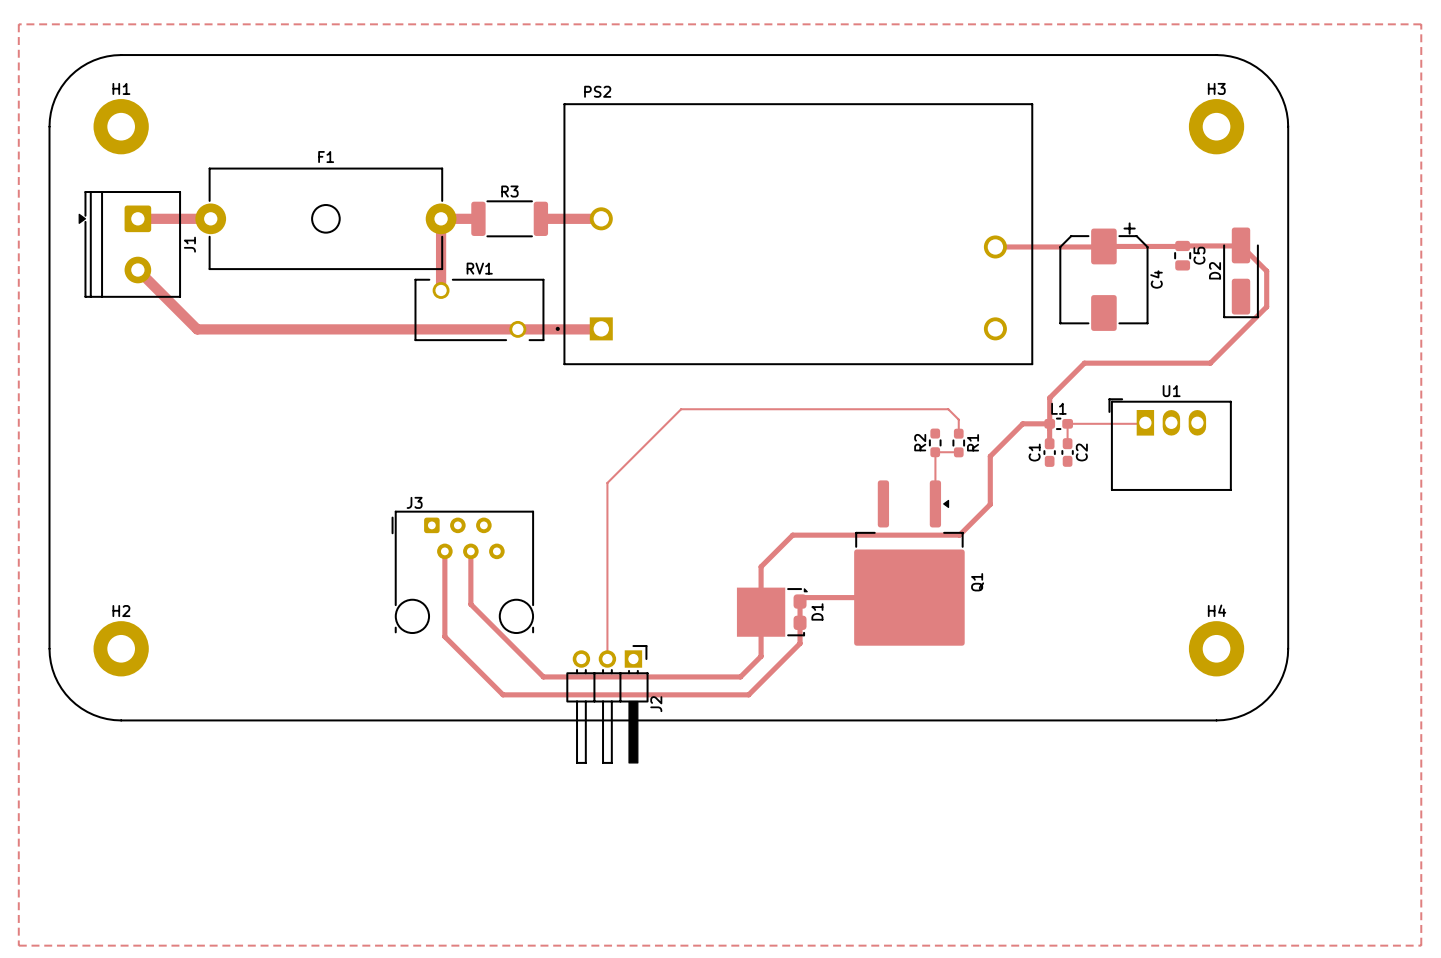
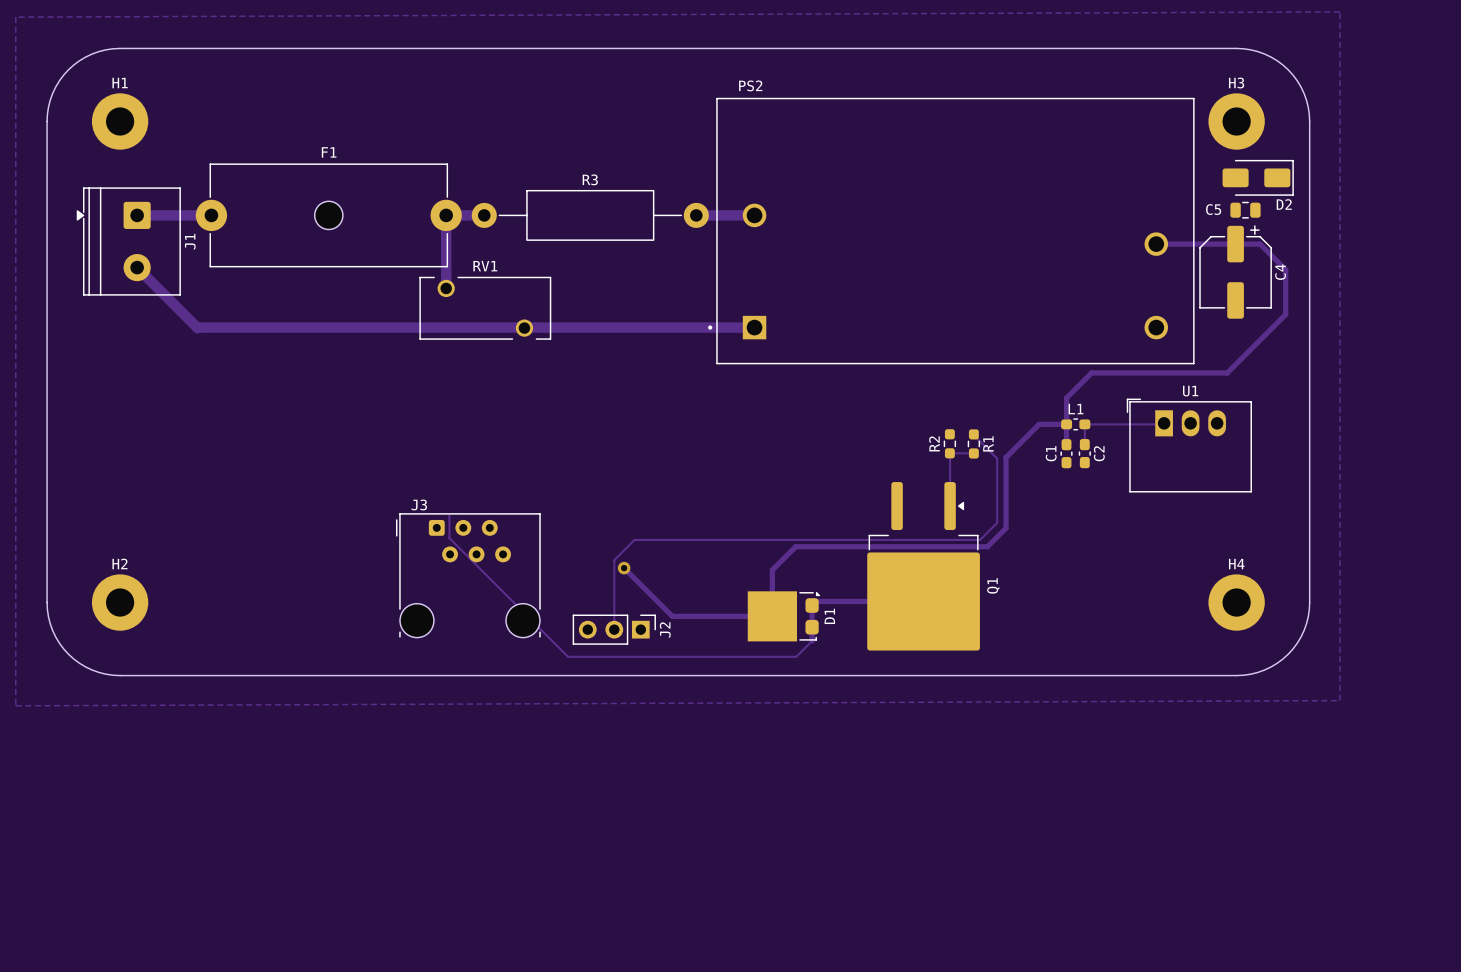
zone outline: (18, 24) (1421, 24) (1421, 945) (18, 945) (18, 699) -> (15, 17) (1339, 11) (1339, 700) (15, 705)
R3 footprint: [471, 200, 549, 237] -> [471, 190, 709, 241]
track: (540, 218) (601, 218) -> none
track: none -> (696, 215) (754, 215)
C4 footprint: [1059, 222, 1149, 331] -> [1199, 225, 1272, 319]
D2 footprint: [1223, 227, 1259, 318] -> [1222, 160, 1294, 196]
PS2 position: (794, 234) -> (951, 231)
track: (995, 246) (1241, 245) (1266, 271) (1266, 306) (1210, 363) (1084, 363) (1074, 373) -> (1156, 244) (1260, 244) (1285, 269) (1285, 314) (1227, 372) (1091, 372)
C5 rotation: 0° (1182, 255) -> 90° clockwise (1245, 210)
C5 position: (1182, 255) -> (1245, 210)
C5 name position: C5 (1199, 255) -> C5 (1213, 209)
D2 name position: D2 (1215, 270) -> D2 (1284, 204)
track: (600, 328) (197, 329) -> (754, 327) (197, 328)
track: (958, 433) (958, 419) (948, 409) (681, 409) (607, 482) (607, 659) -> none
track: none -> (973, 435) (997, 458) (997, 522) (980, 539) (634, 539) (614, 560) (614, 629)
track: (990, 504) (959, 535) (792, 535) (784, 543) -> (1006, 506) (1006, 528) (987, 546) (795, 546)
track: (444, 551) (444, 636) (503, 694) (748, 694) (800, 643) (800, 636) -> (449, 515) (449, 538) (568, 656) (796, 656) (812, 640)
track: (470, 551) (470, 604) (543, 676) (740, 676) (761, 656) (761, 612) -> (624, 568) (672, 616) (772, 616)
via: none -> (624, 568)
board edge: (49, 598) (49, 655) (57, 682) (65, 694) (81, 708) (100, 717) (121, 720) (1223, 720) (1237, 717) (1256, 708) (1271, 694) (1279, 682) (1287, 655) (1288, 598) -> (47, 602) (52, 630) (68, 654) (92, 670) (120, 675) (1243, 675) (1264, 670) (1288, 654) (1304, 630) (1309, 602)
J2 footprint: [566, 645, 649, 764] -> [572, 614, 656, 645]
H2 position: (121, 648) -> (120, 602)
H4 position: (1216, 648) -> (1236, 602)

